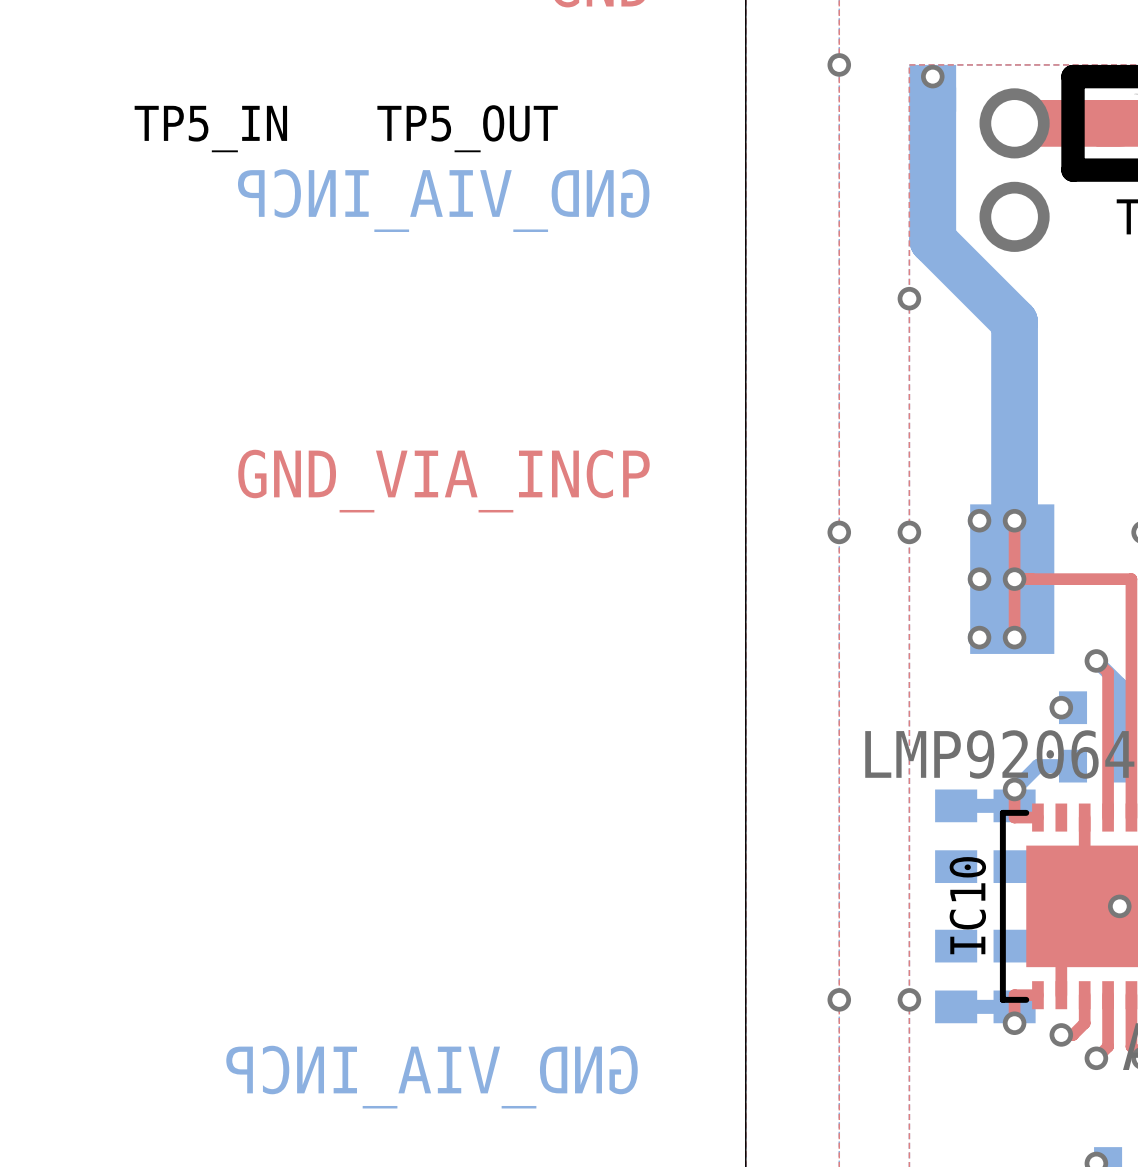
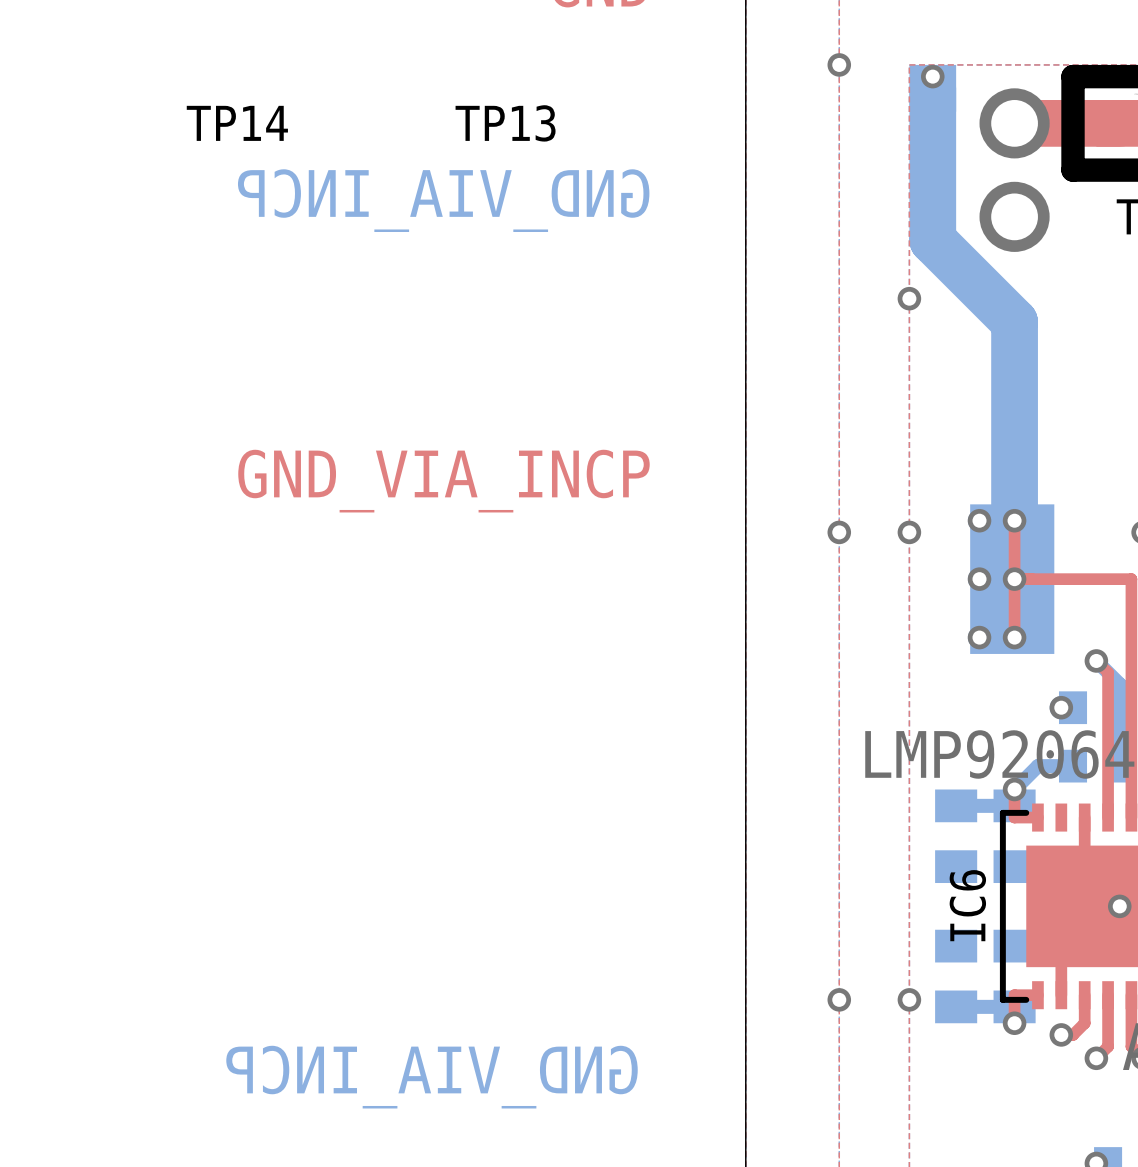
TP5_OUT name: TP5_OUT (467, 128) -> TP13 (505, 123)
TP5_IN name: TP5_IN (210, 129) -> TP14 (237, 123)
IC10 name: IC10 (967, 905) -> IC6 (967, 905)

